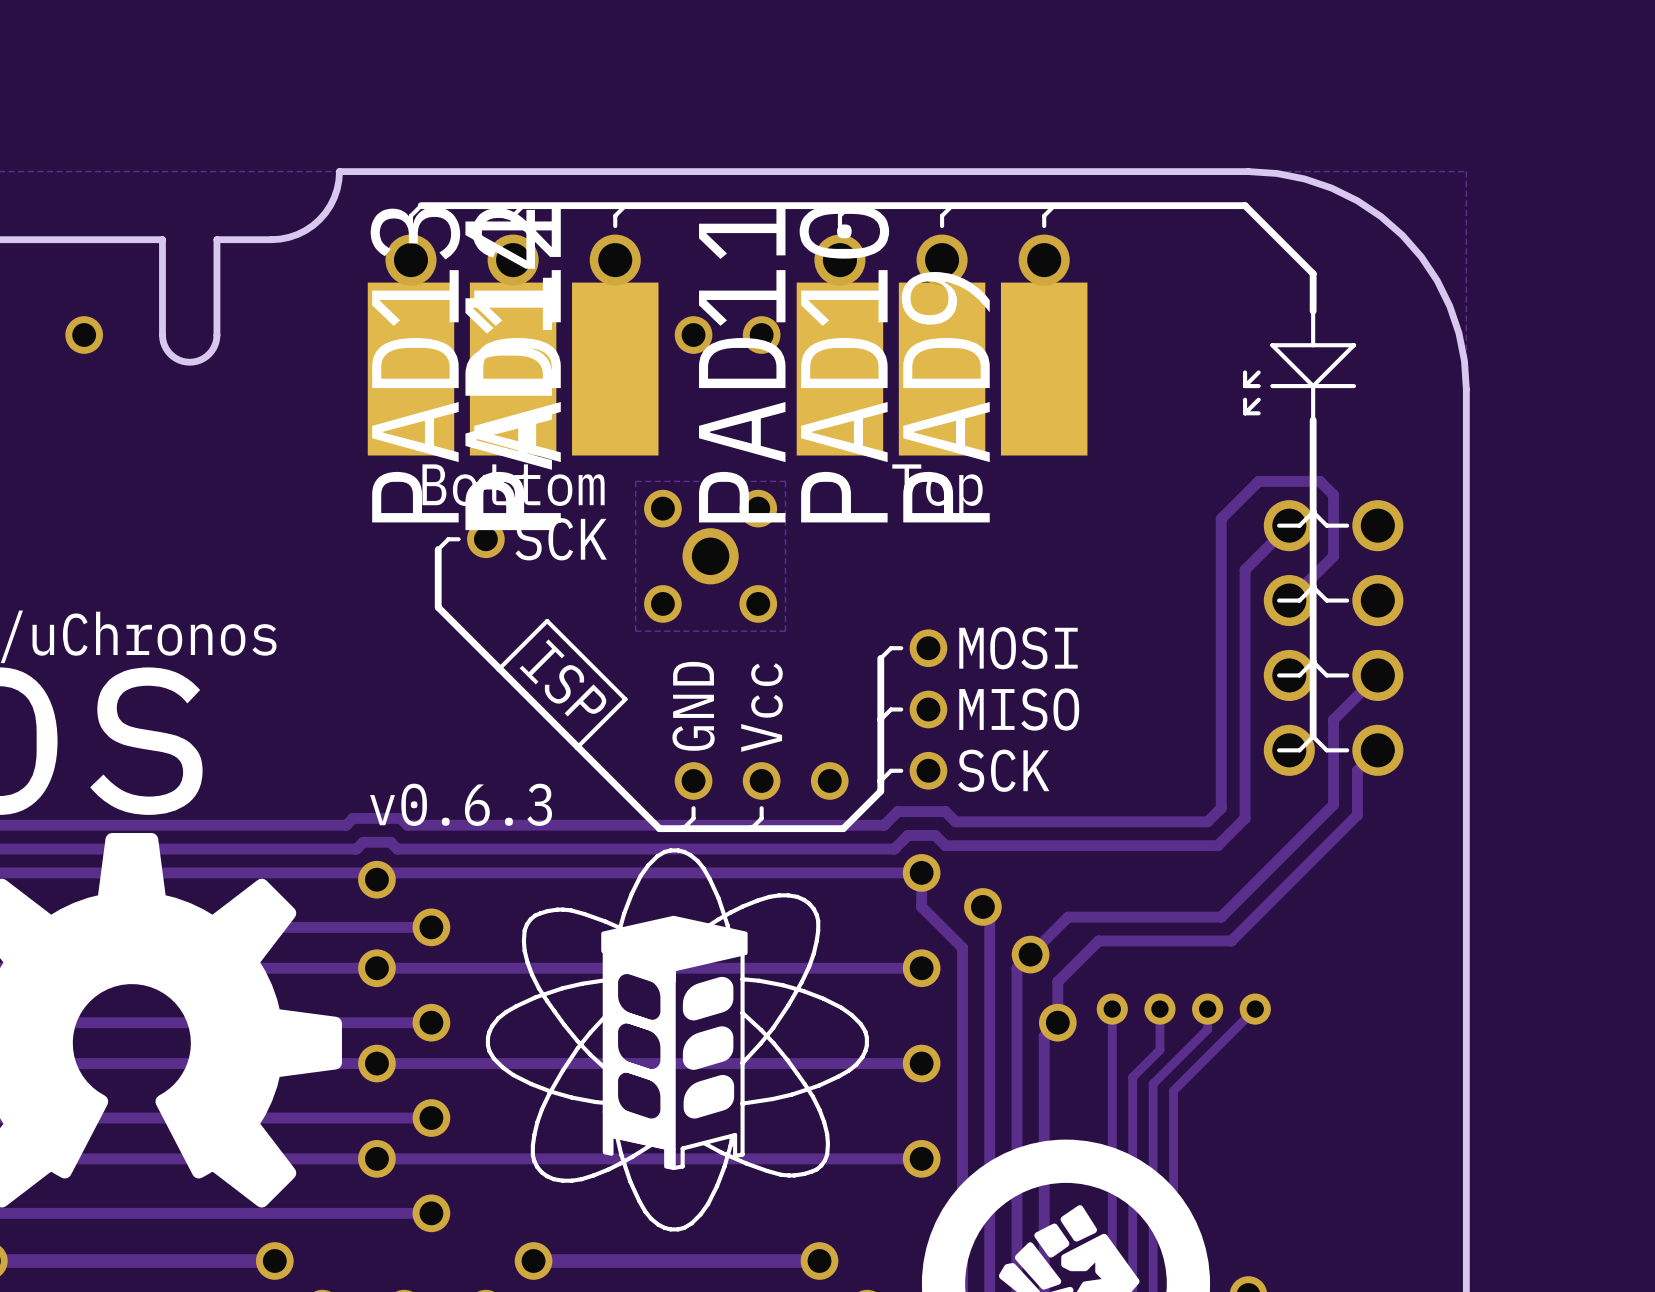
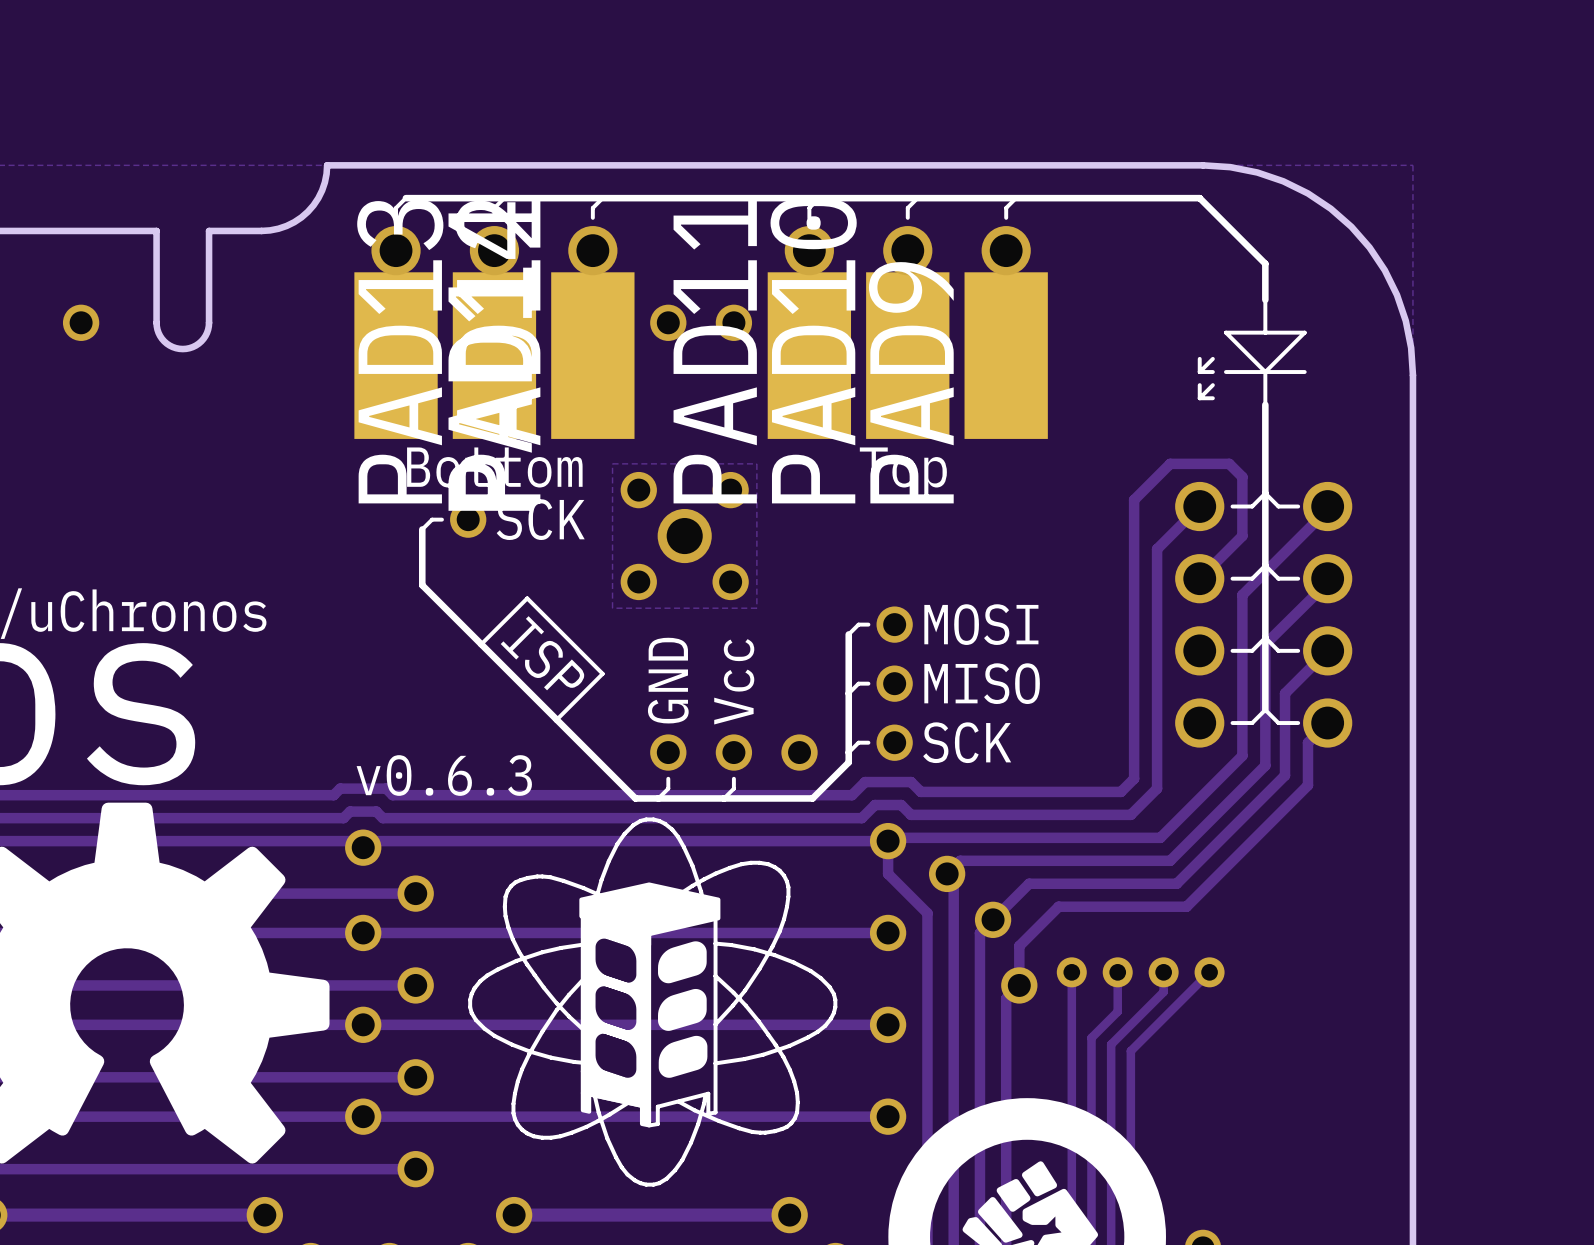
track: (1258, 481) (1221, 518) (1221, 808) (1207, 821) (1163, 821) -> (1212, 463) (1170, 463) (1134, 499) (1134, 778) (1121, 791)
track: (1275, 481) (1319, 481) (1333, 495) (1333, 556) (1289, 600) -> (1229, 463) (1242, 476) (1242, 536) (1199, 578)
track: (1289, 525) (1245, 569) (1245, 818) (1217, 845) (1173, 845) -> (1199, 506) (1157, 549) (1157, 788) (1130, 814)
via position: (1289, 525) -> (1199, 506)
track: none -> (1330, 506) (1242, 595) (1242, 755) (1160, 837) (891, 837) (888, 841)
via position: (1289, 600) -> (1199, 578)
track: none -> (1330, 579) (1265, 644) (1265, 765) (1170, 860) (960, 860) (947, 873)
via position: (1289, 675) -> (1199, 650)
via position: (1289, 750) -> (1199, 723)

